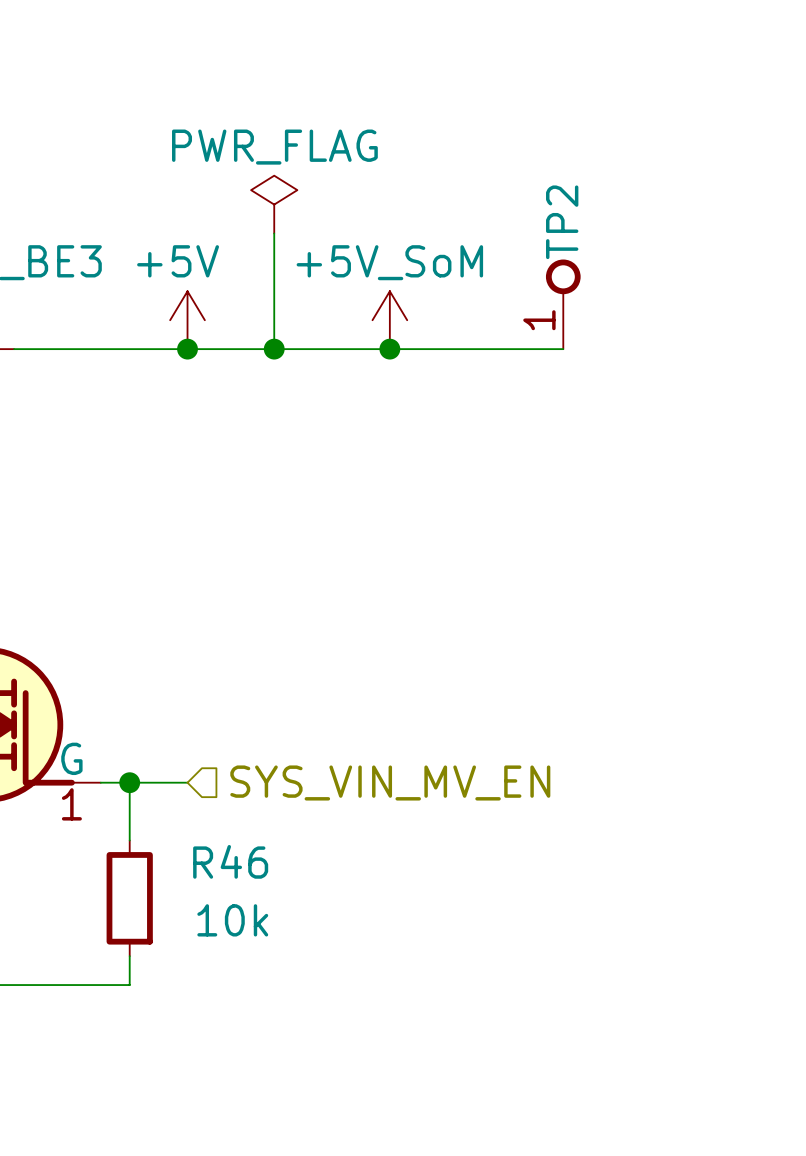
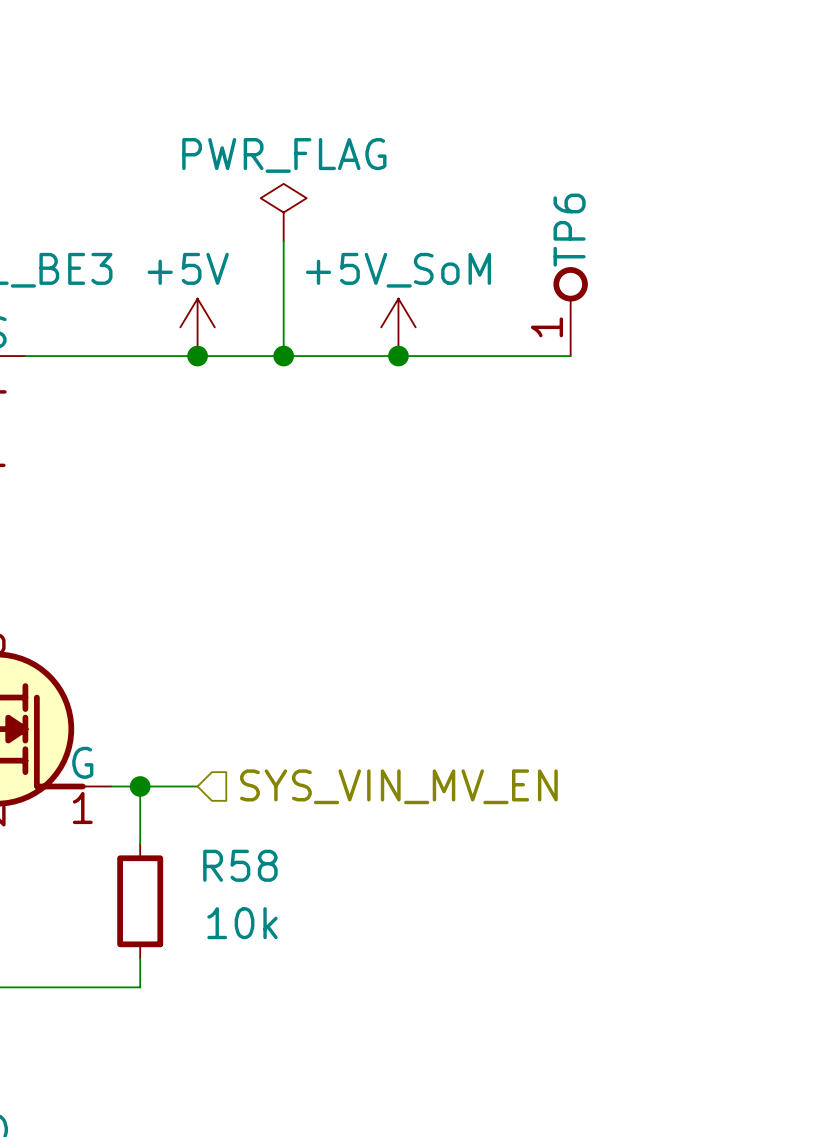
TP2 name: TP2 (562, 222) -> TP6 (569, 230)
R46 name: R46 (230, 861) -> R58 (240, 865)

